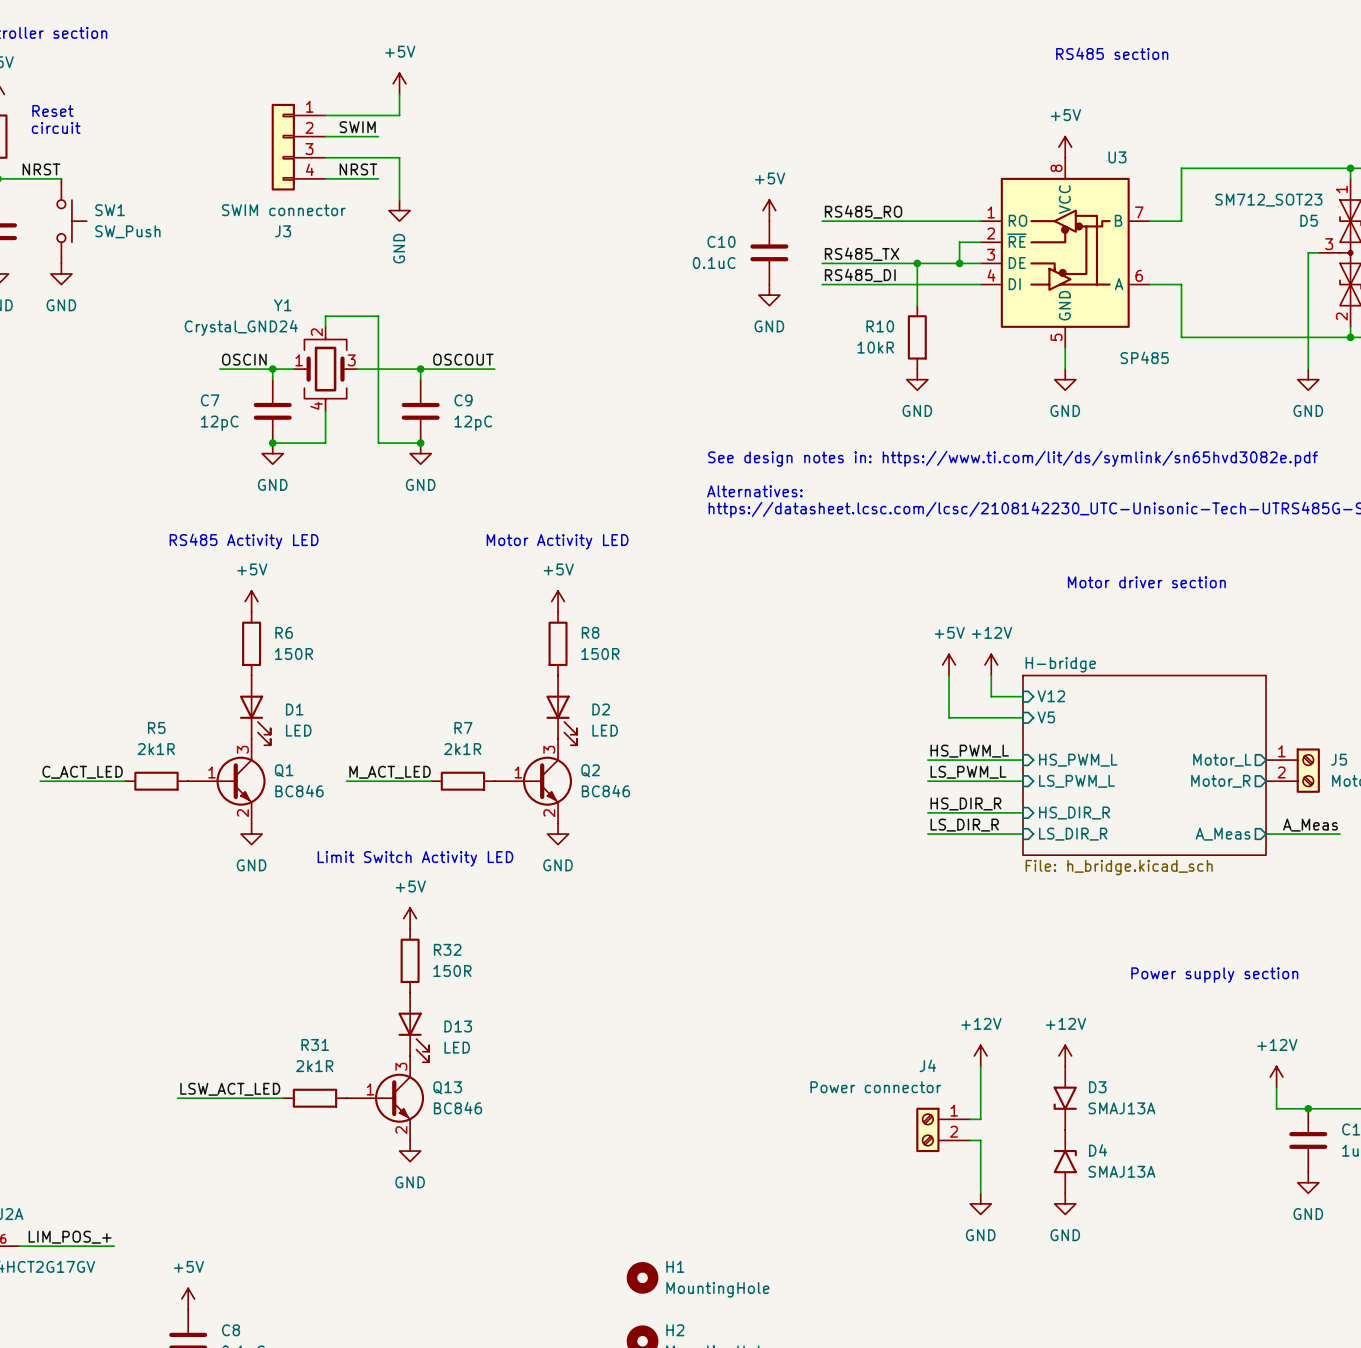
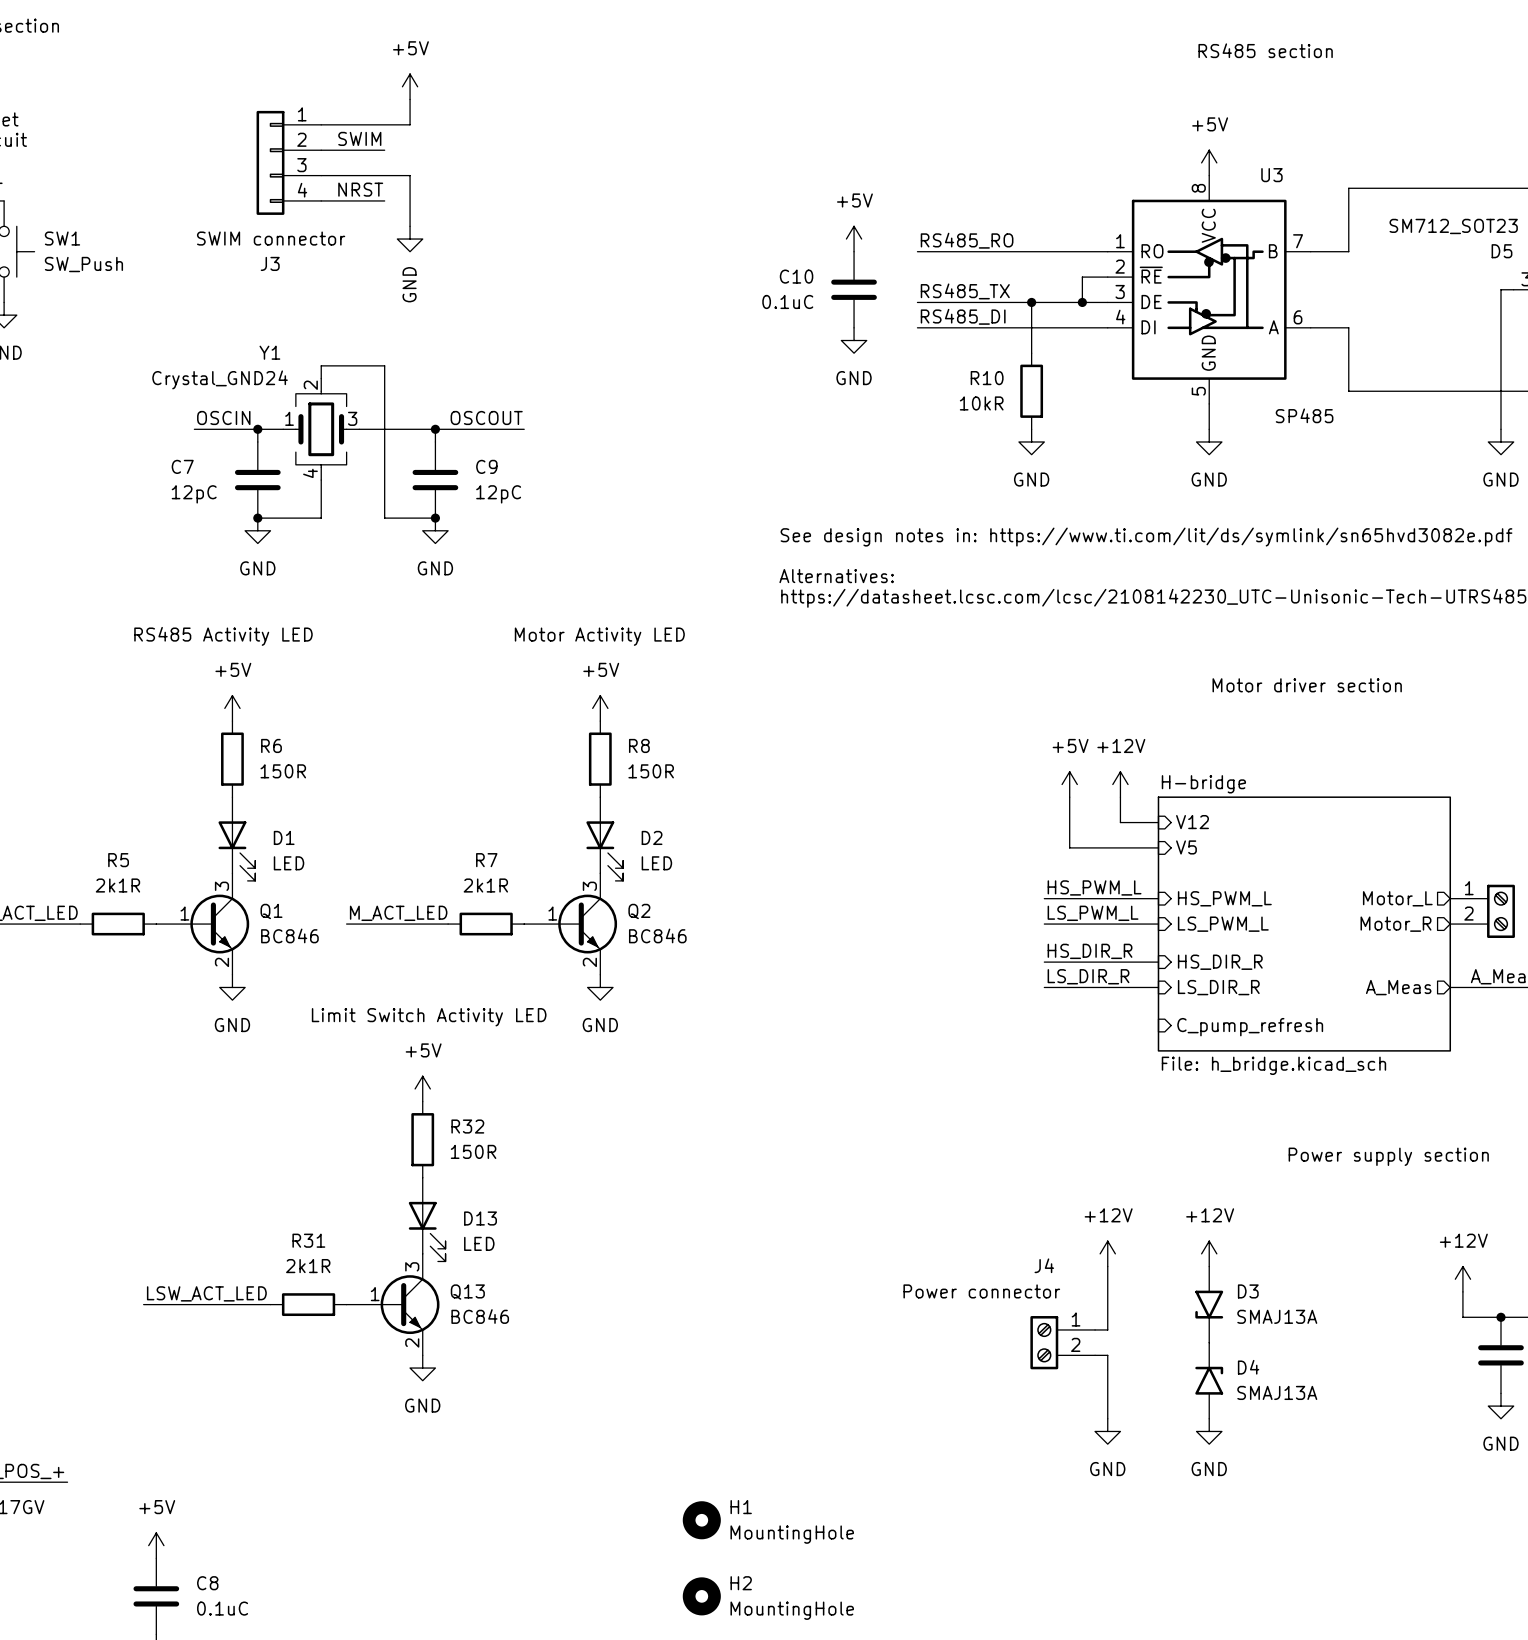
sheet H-bridge: File: h_bridge.kicad_sch (1144, 765) -> none
sheet H-bridge: none -> File: h_bridge.kicad_sch (1304, 924)
sheet pin: none -> C_pump_refresh (1250, 1027)

